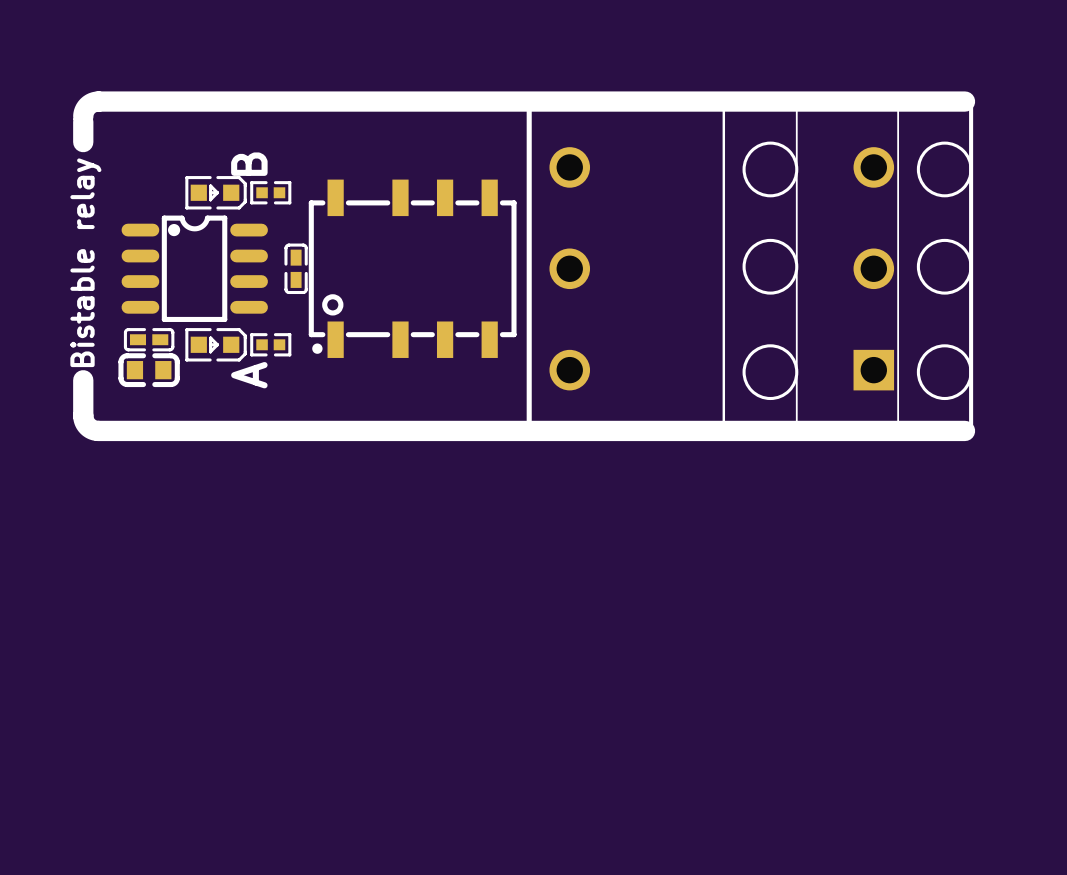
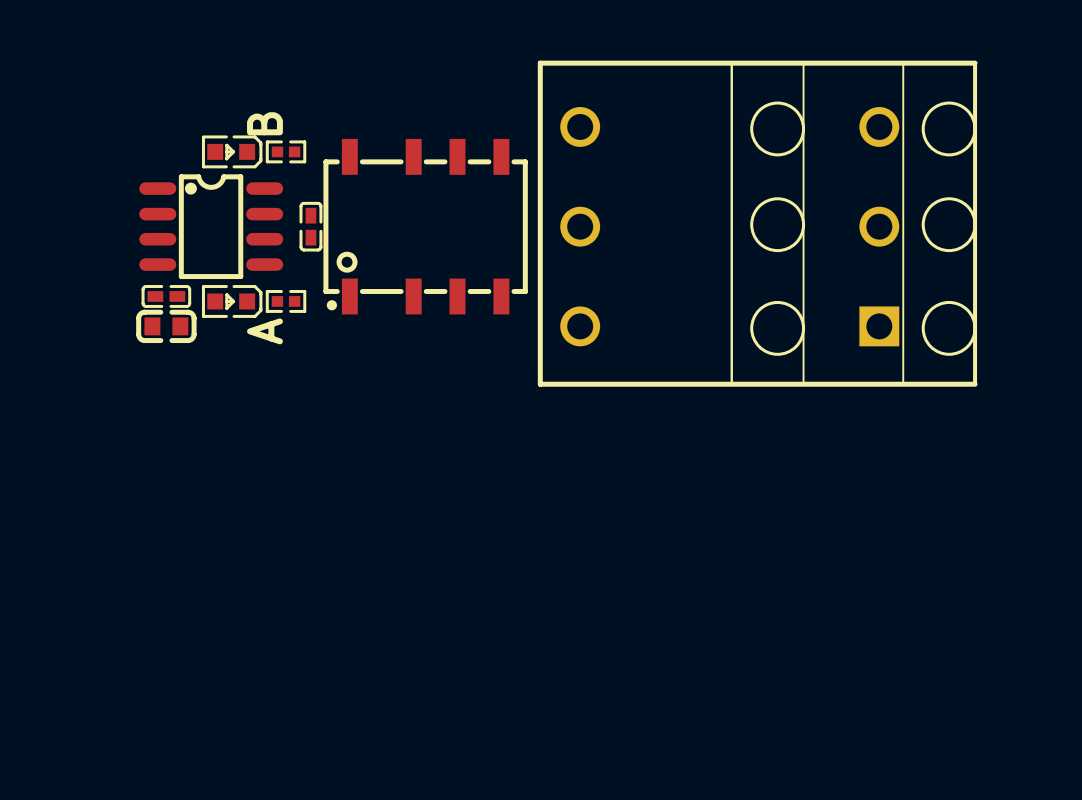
line: (965, 101) (98, 101) (87, 106) (83, 116) -> none
line: (83, 121) (83, 142) -> none
text: Bistable relay (85, 262) -> none
line: (83, 380) (83, 419) (89, 427) (98, 430) (965, 430) -> none

